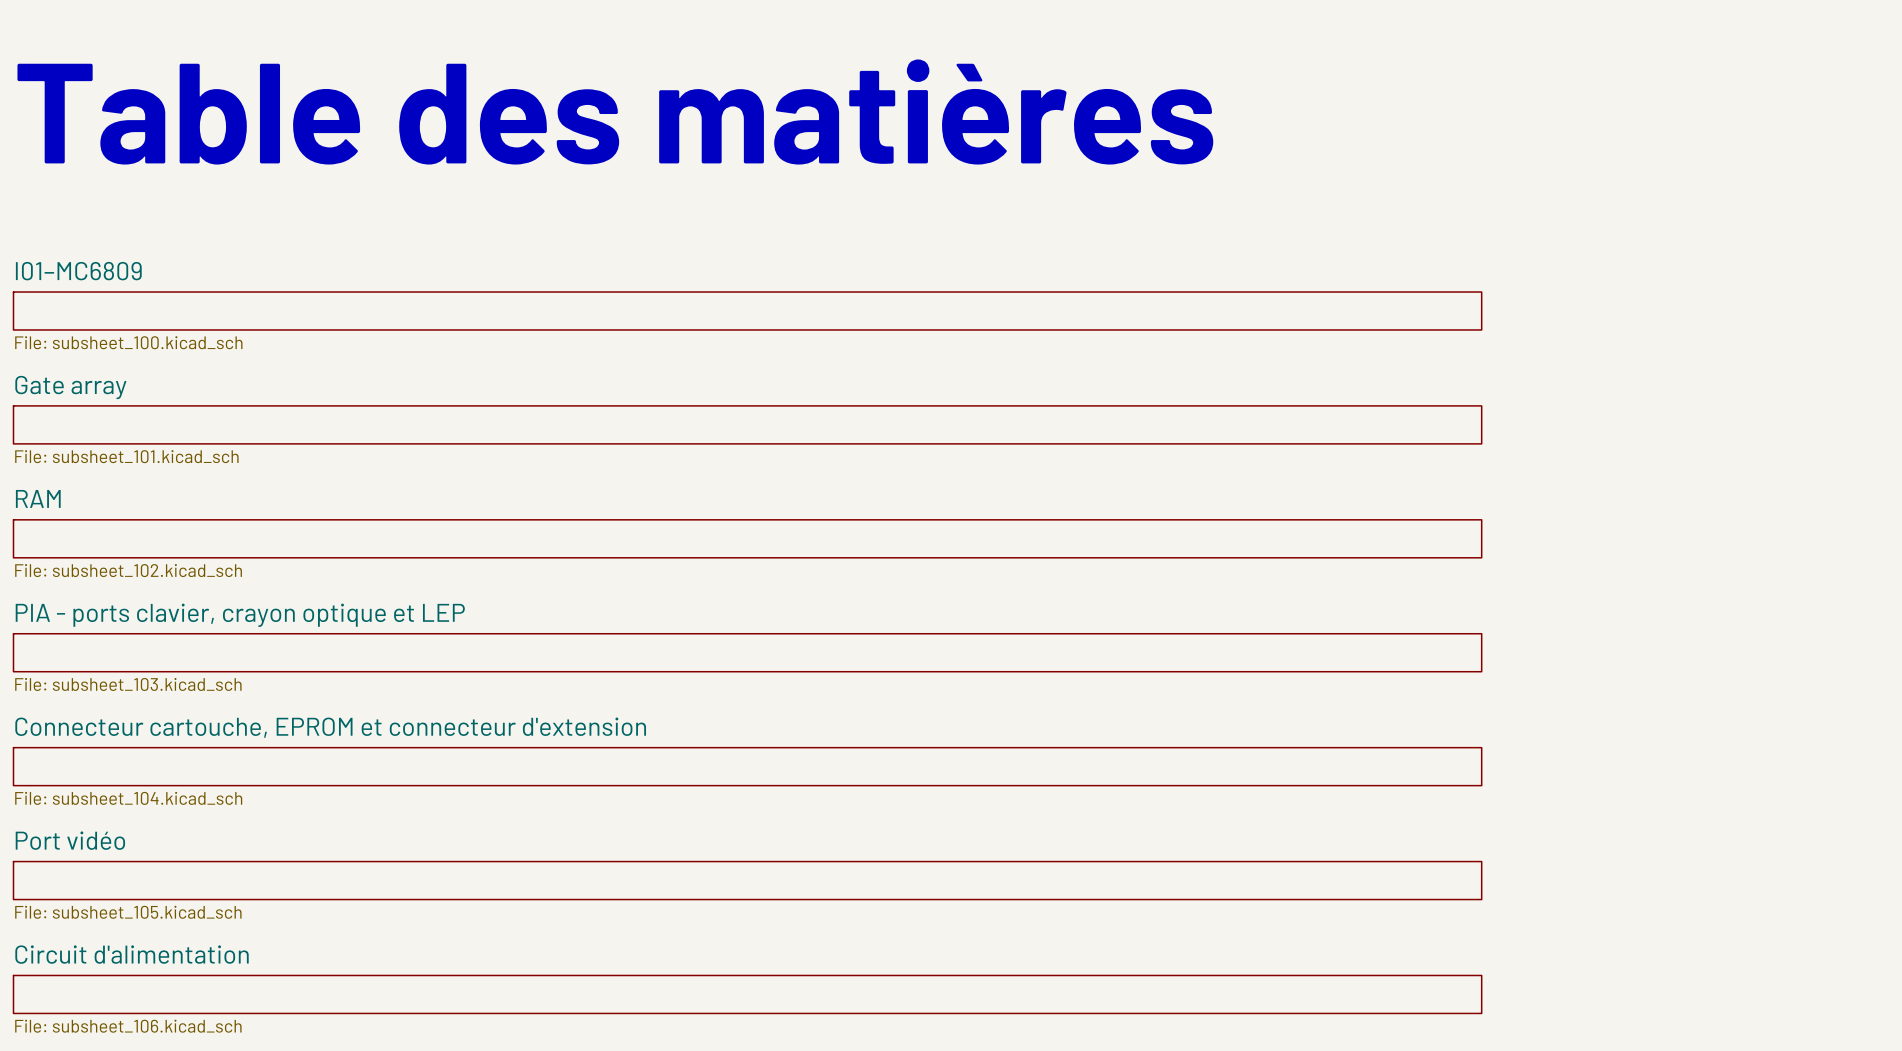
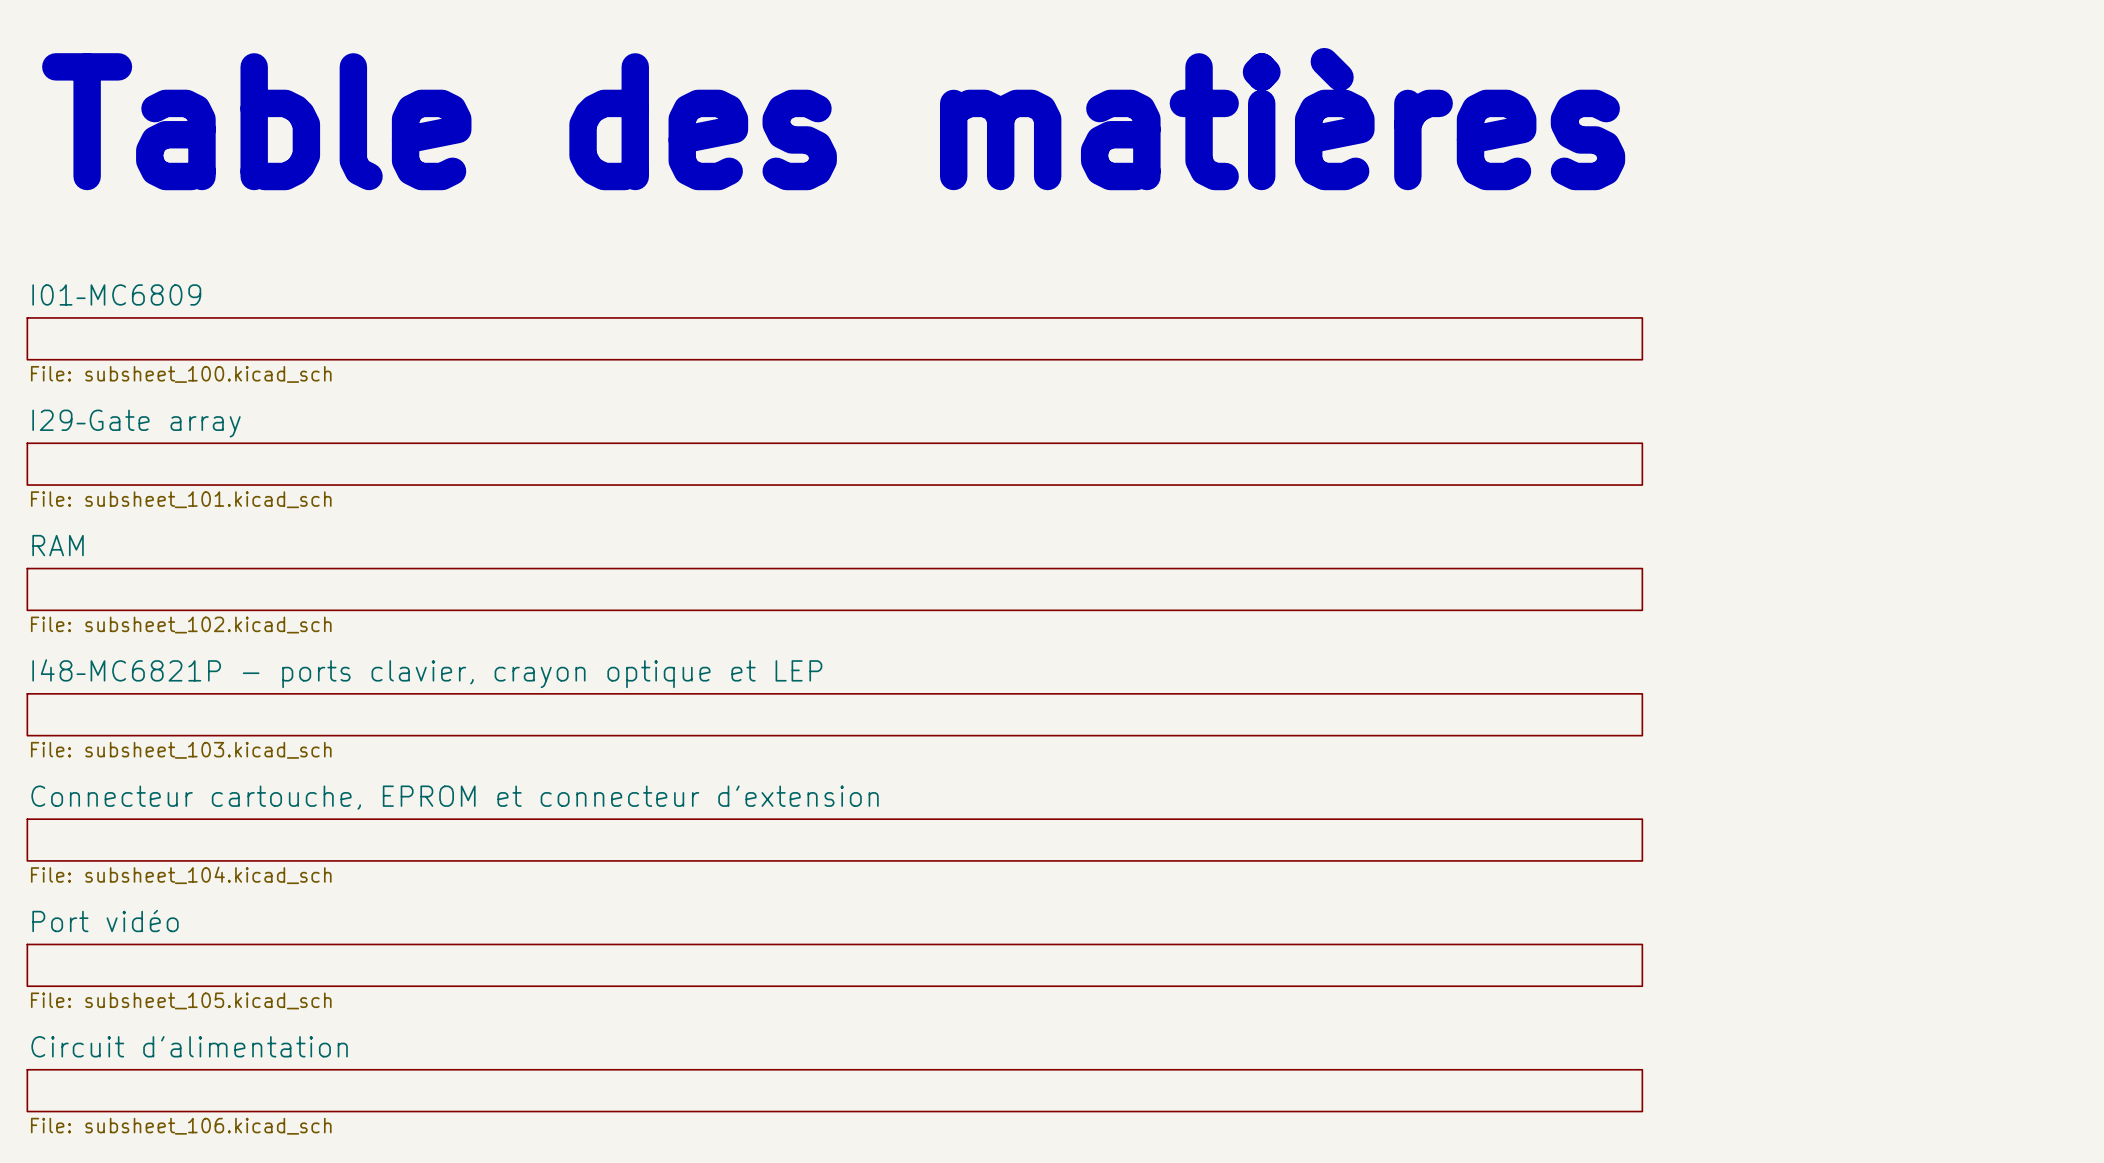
sheet Gate array name: Gate array (70, 387) -> I29–Gate array (136, 423)
sheet PIA - ports clavier, crayon optique et LEP name: PIA - ports clavier, crayon optique et LEP (240, 615) -> I48–MC6821P - ports clavier, crayon optique et LEP (427, 673)

